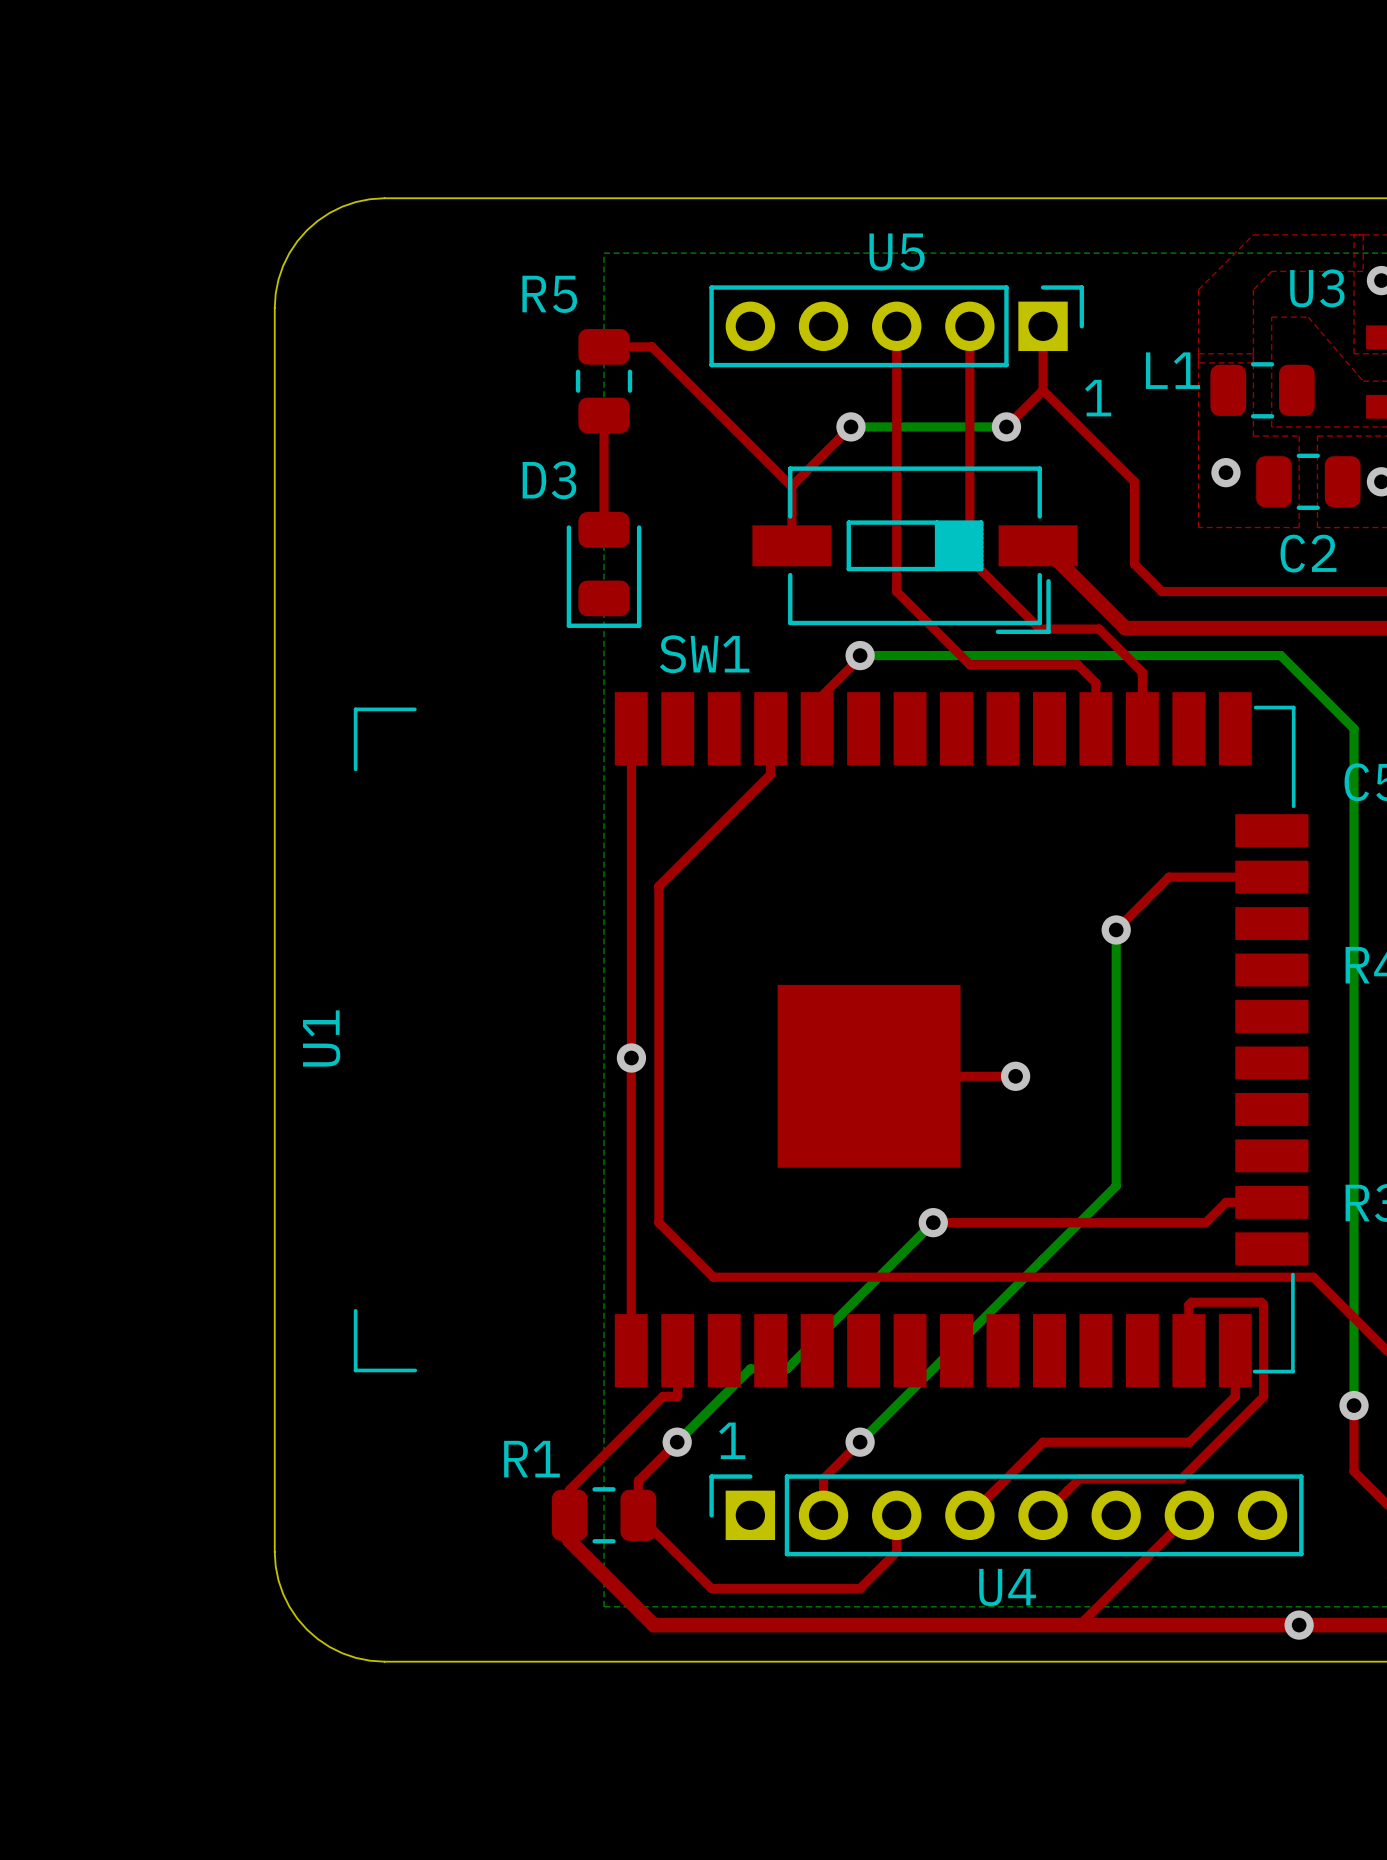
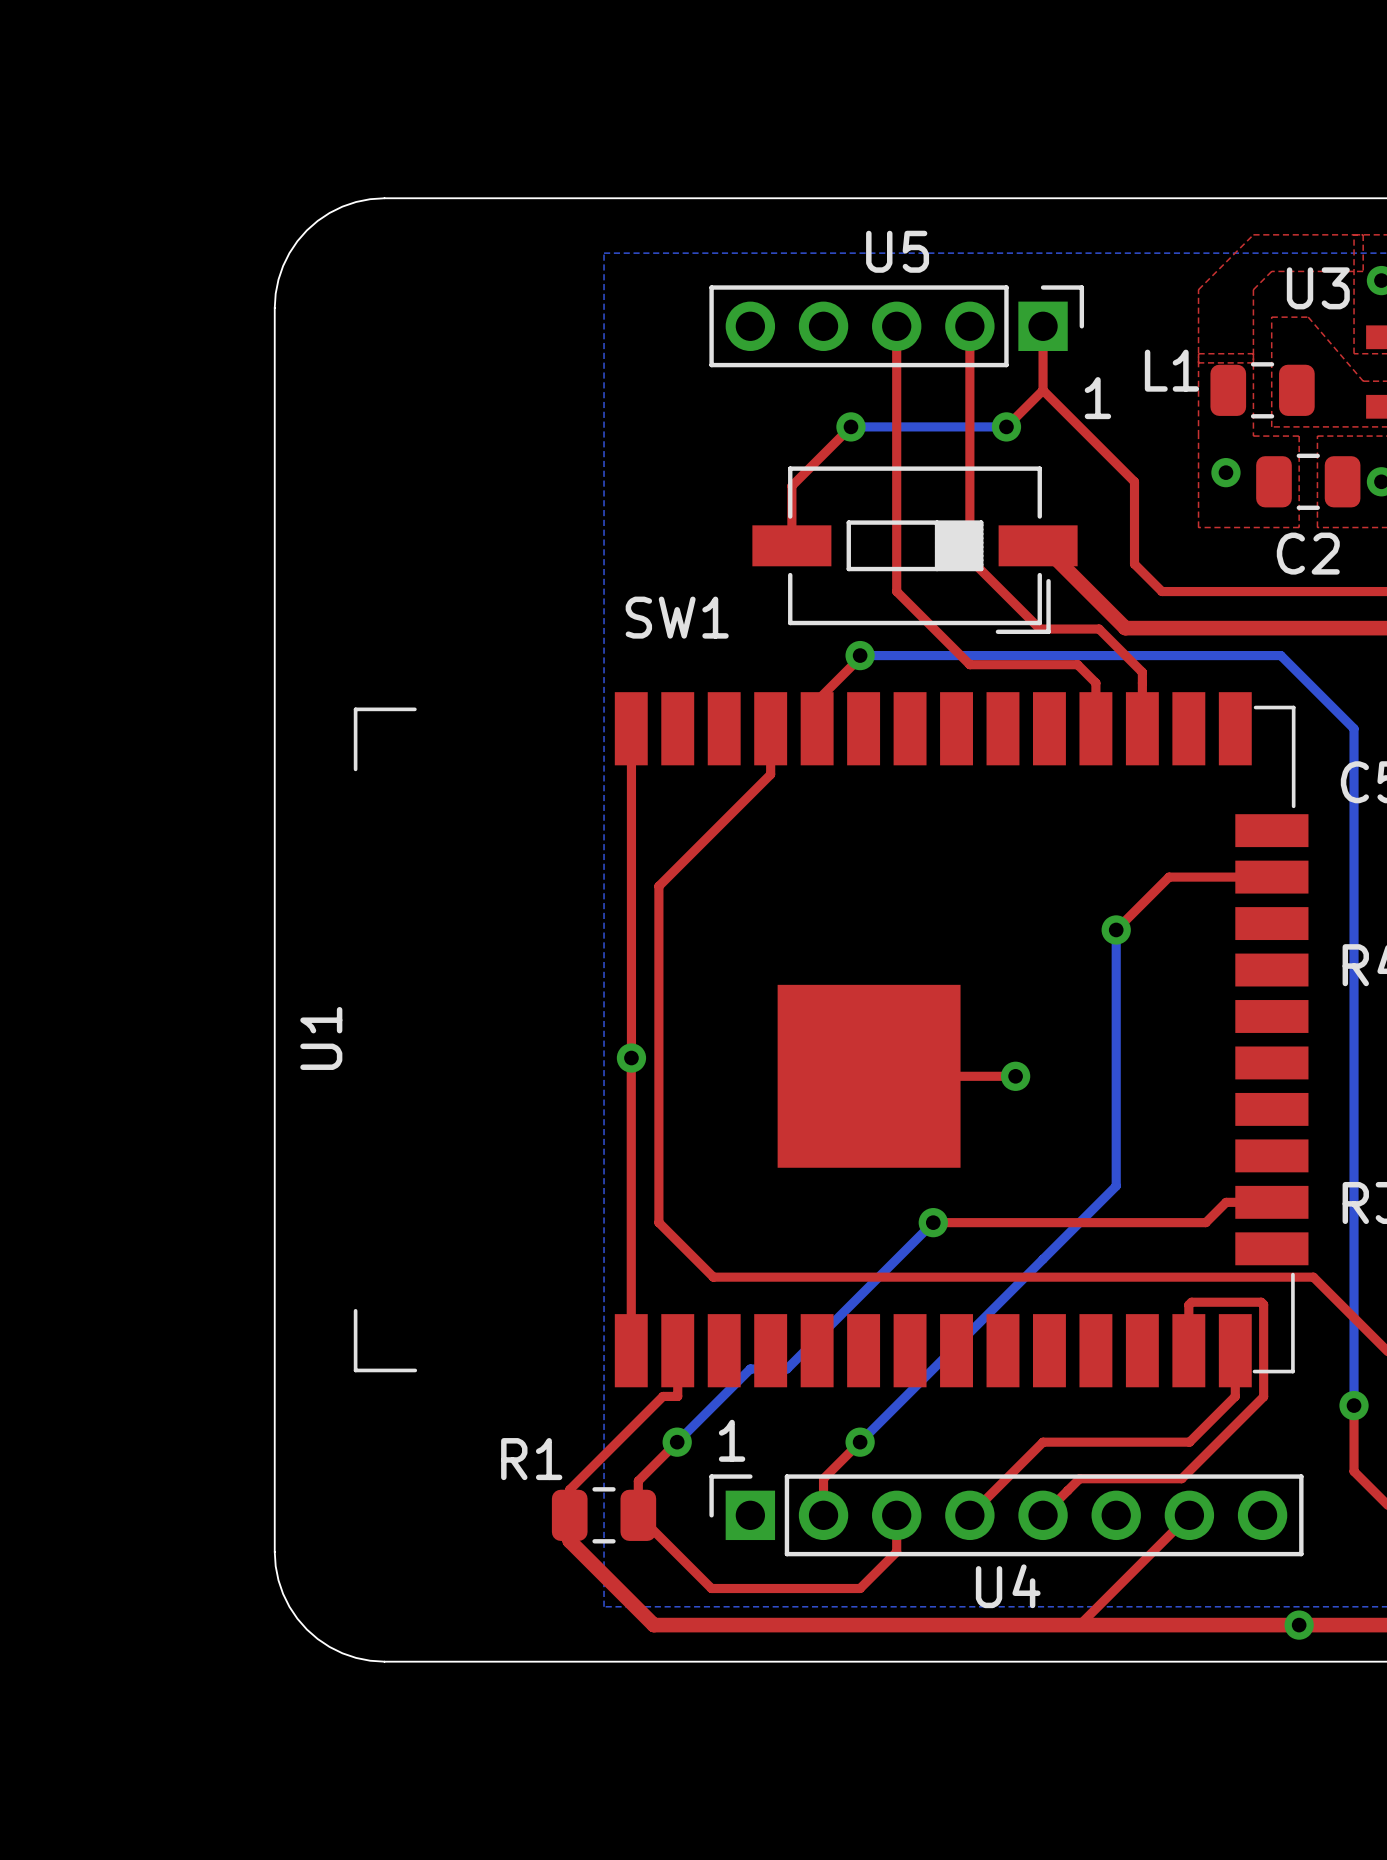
top track: (604, 346) (652, 346) (791, 486) -> none
R5: (604, 381) -> none
top track: (604, 415) (604, 529) -> none
D3: (604, 569) -> none
SW1 name position: SW1 (704, 654) -> SW1 (677, 617)

